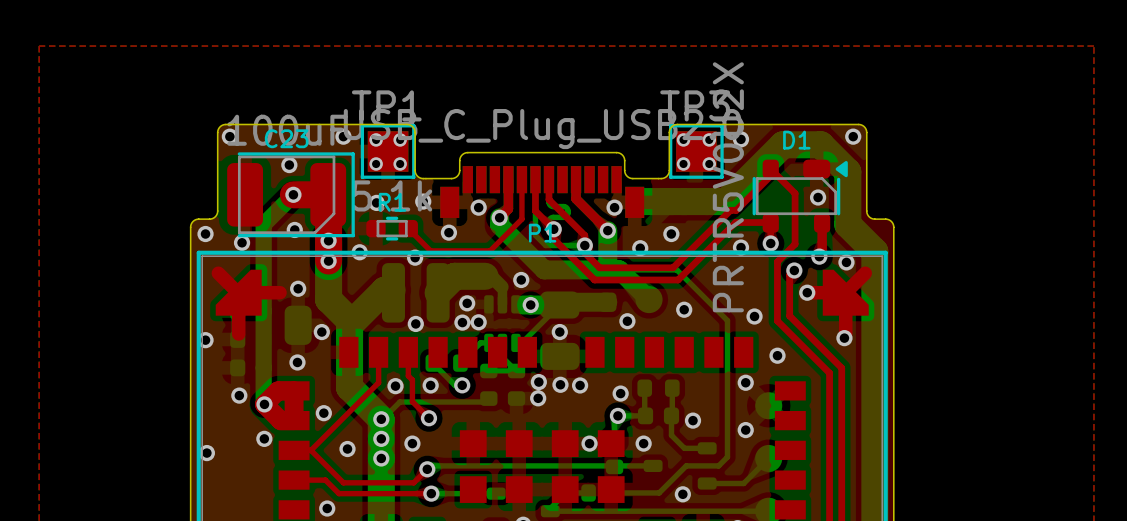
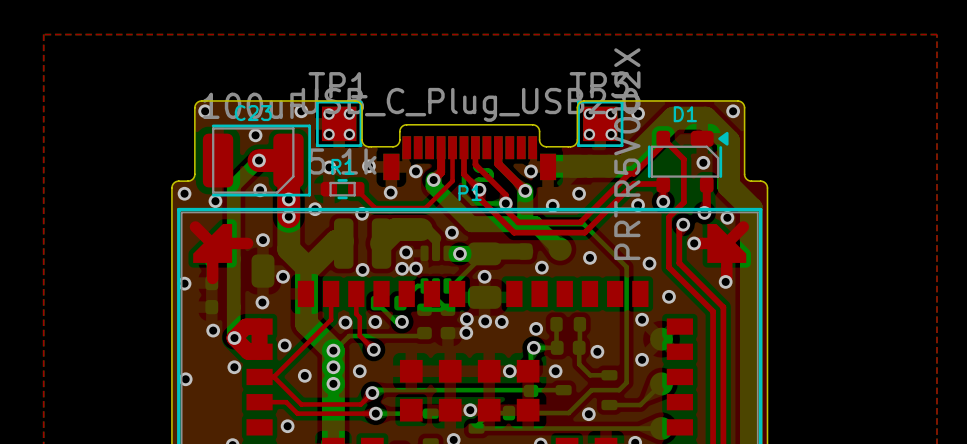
via: none -> (470, 410)

